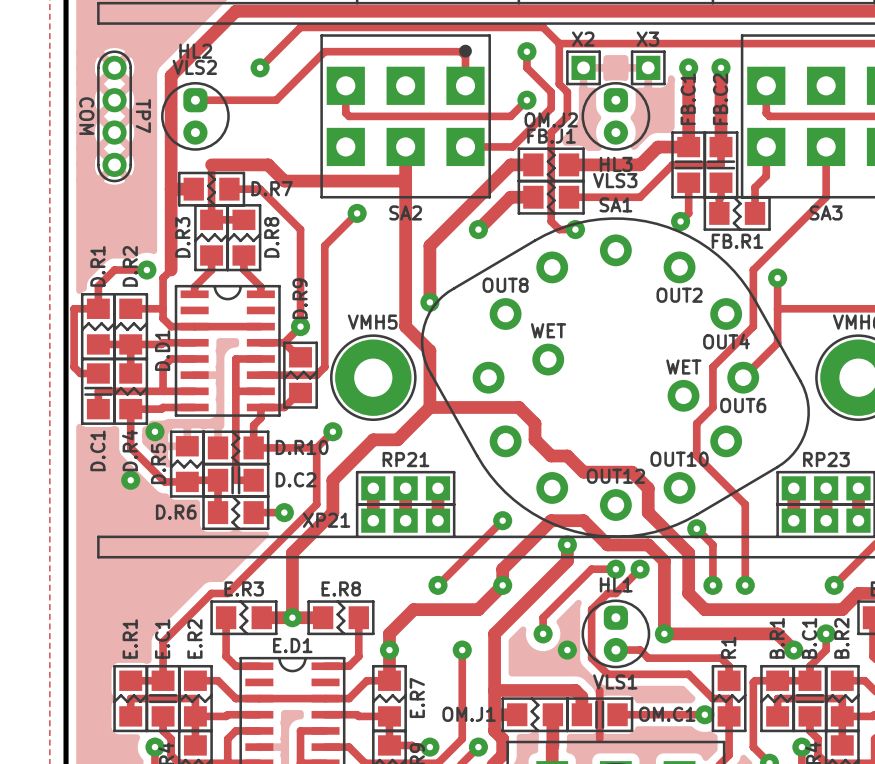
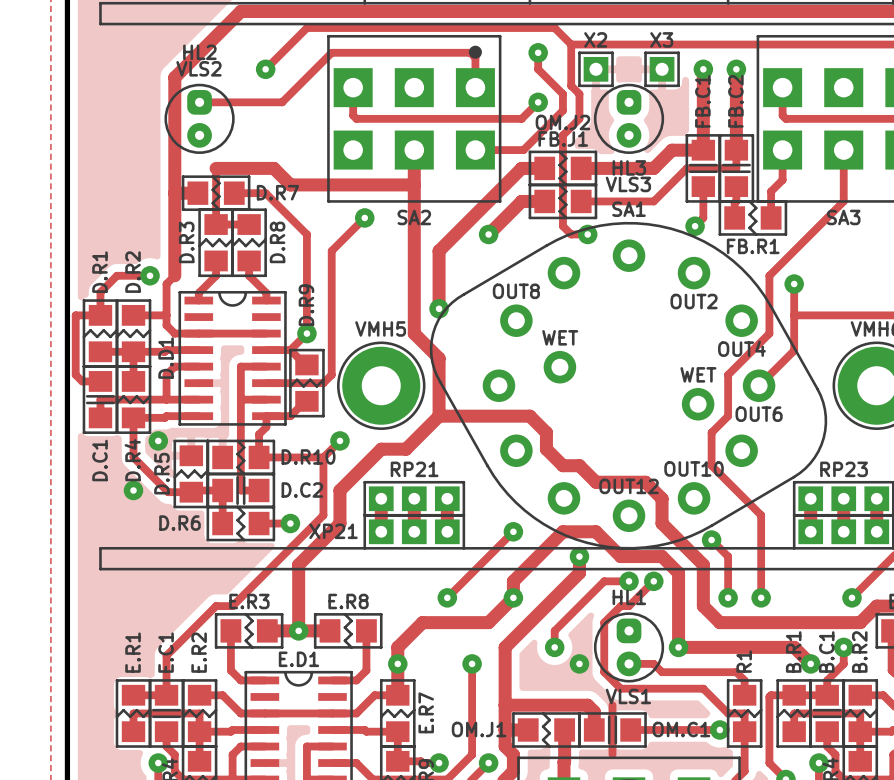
TP7: COM (114, 116) -> none

